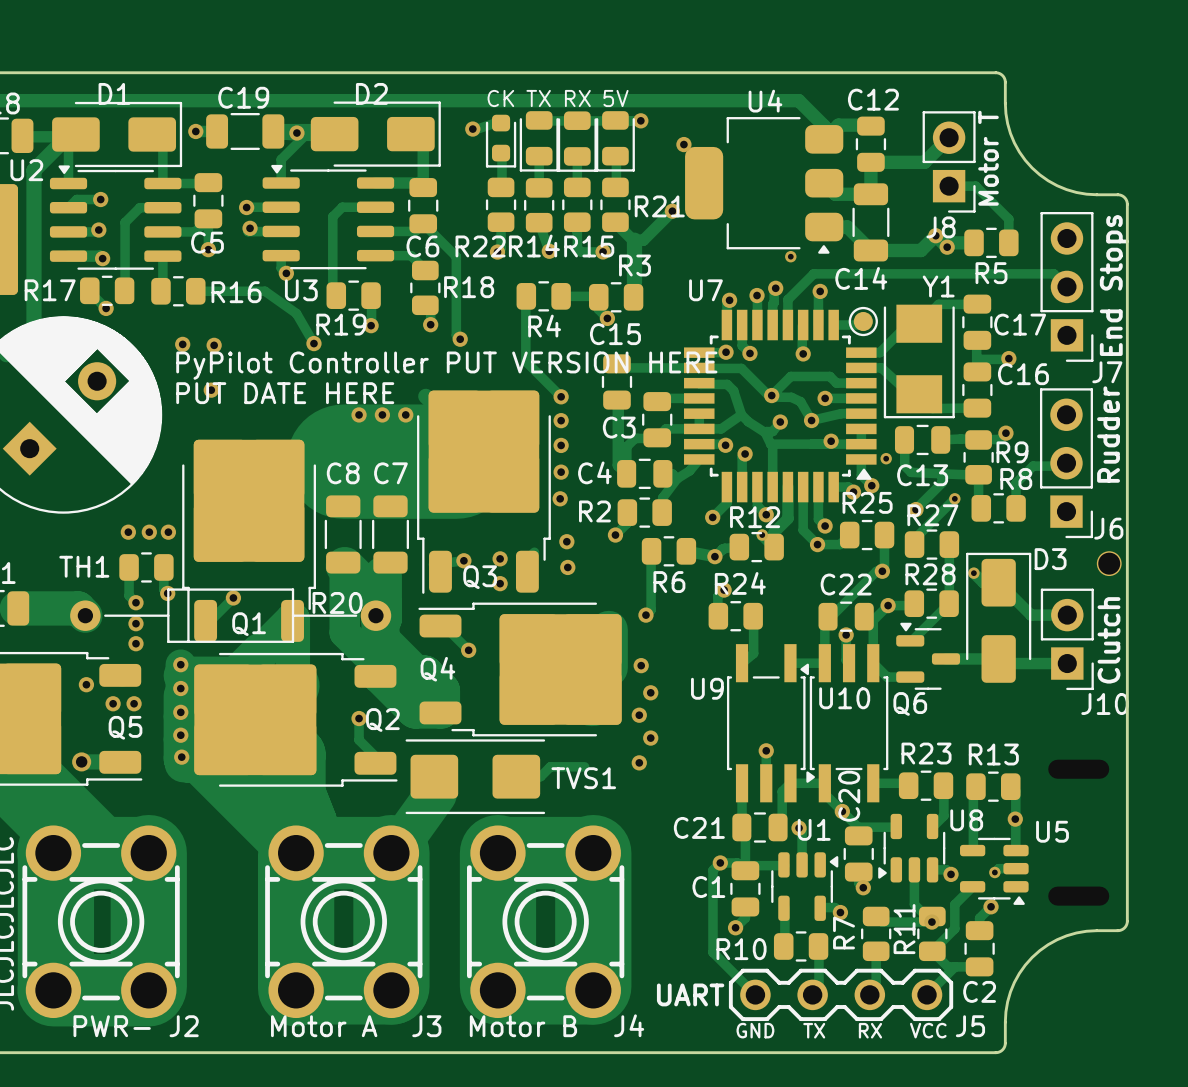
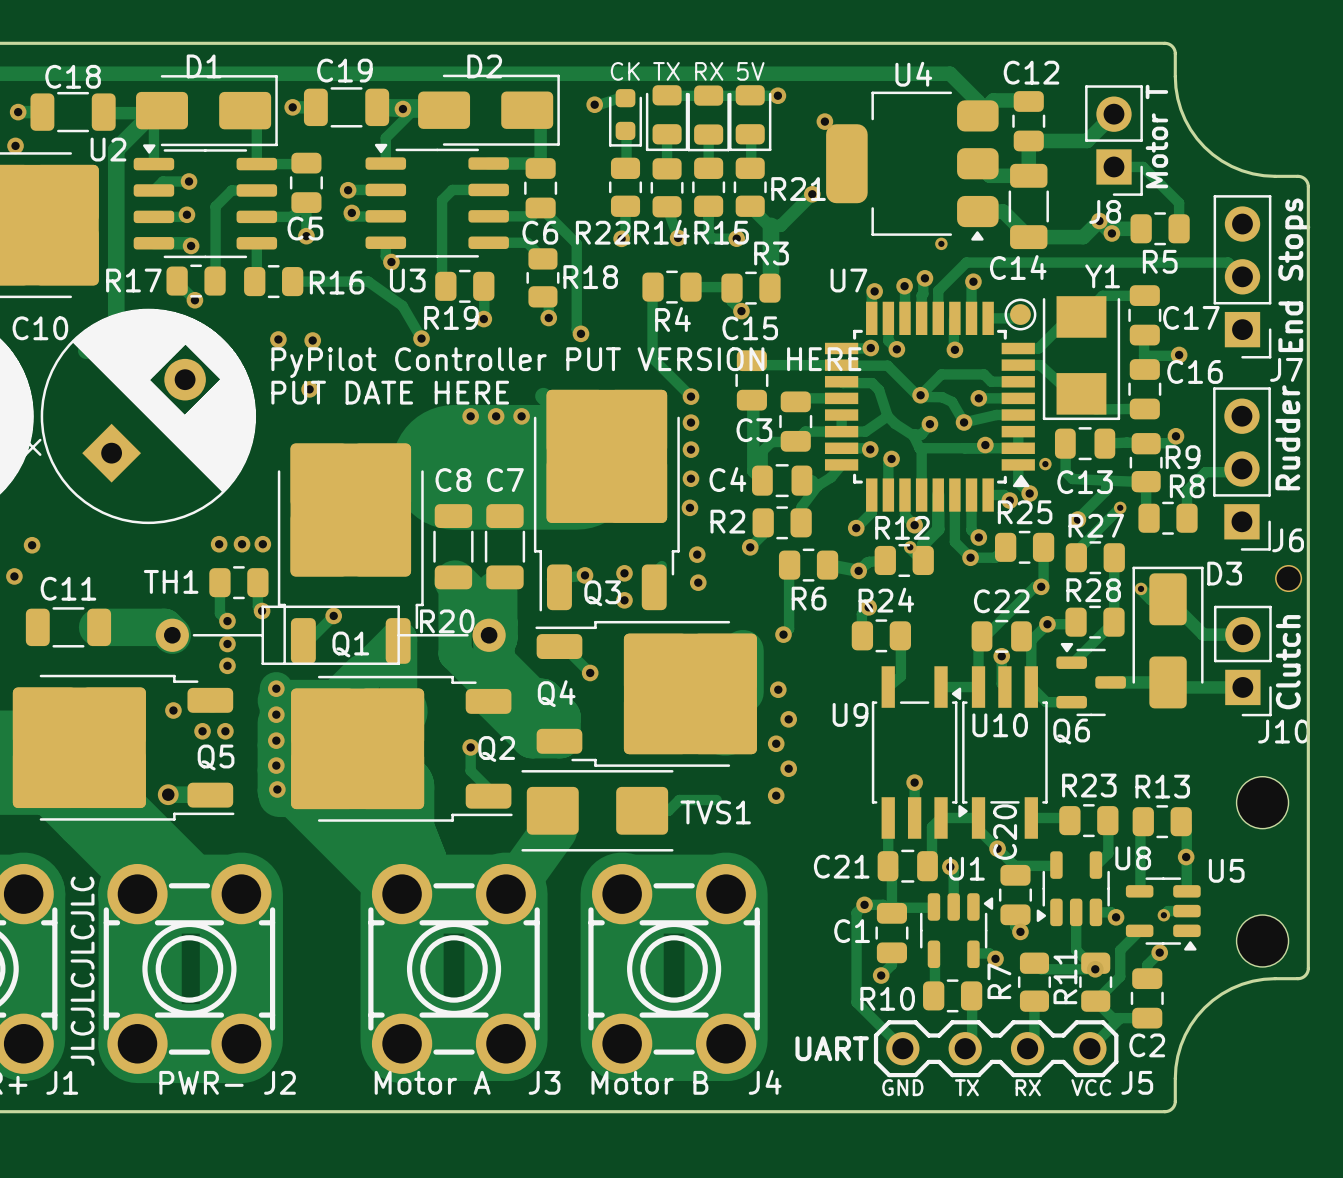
part footprint: [1048, 759, 1110, 779] -> [1236, 776, 1289, 829]
part footprint: [1048, 886, 1110, 906] -> [1236, 915, 1289, 967]

